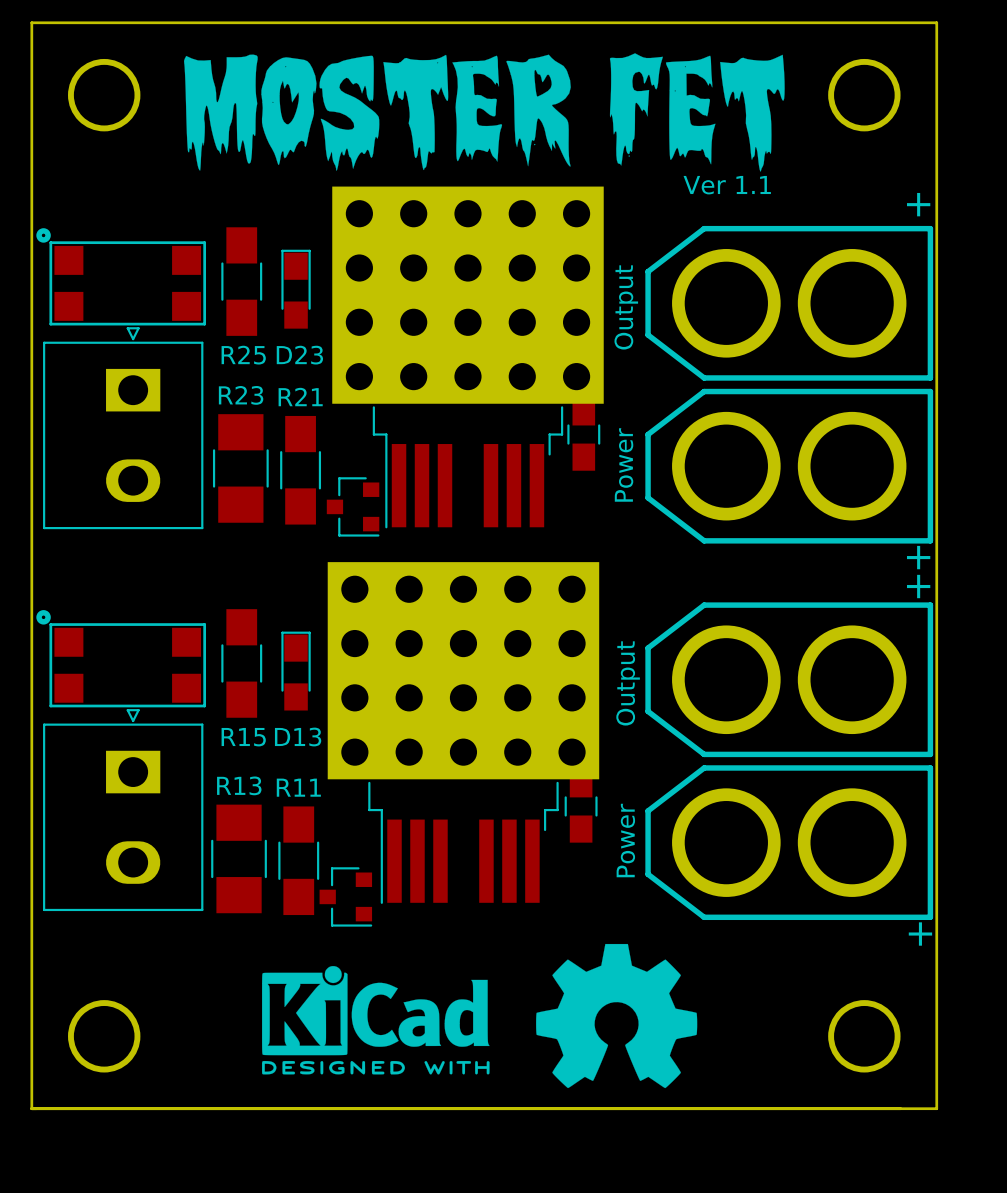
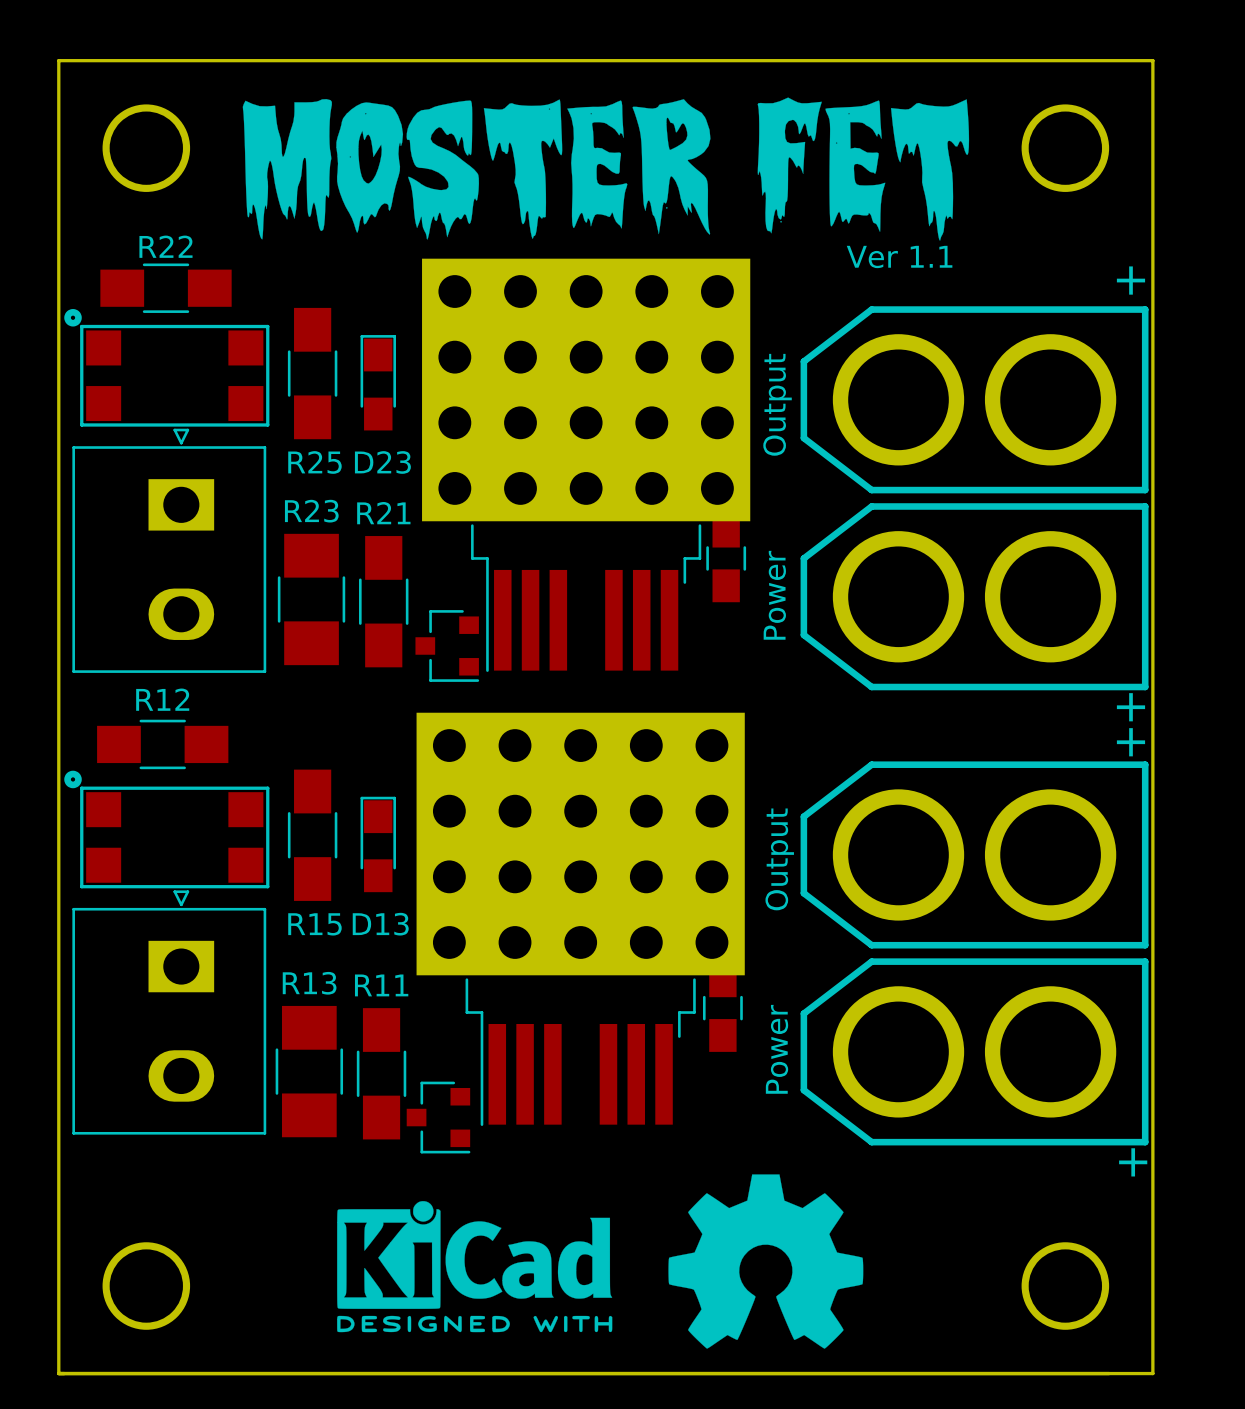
R22: none -> (166, 288)
R12: none -> (162, 744)

